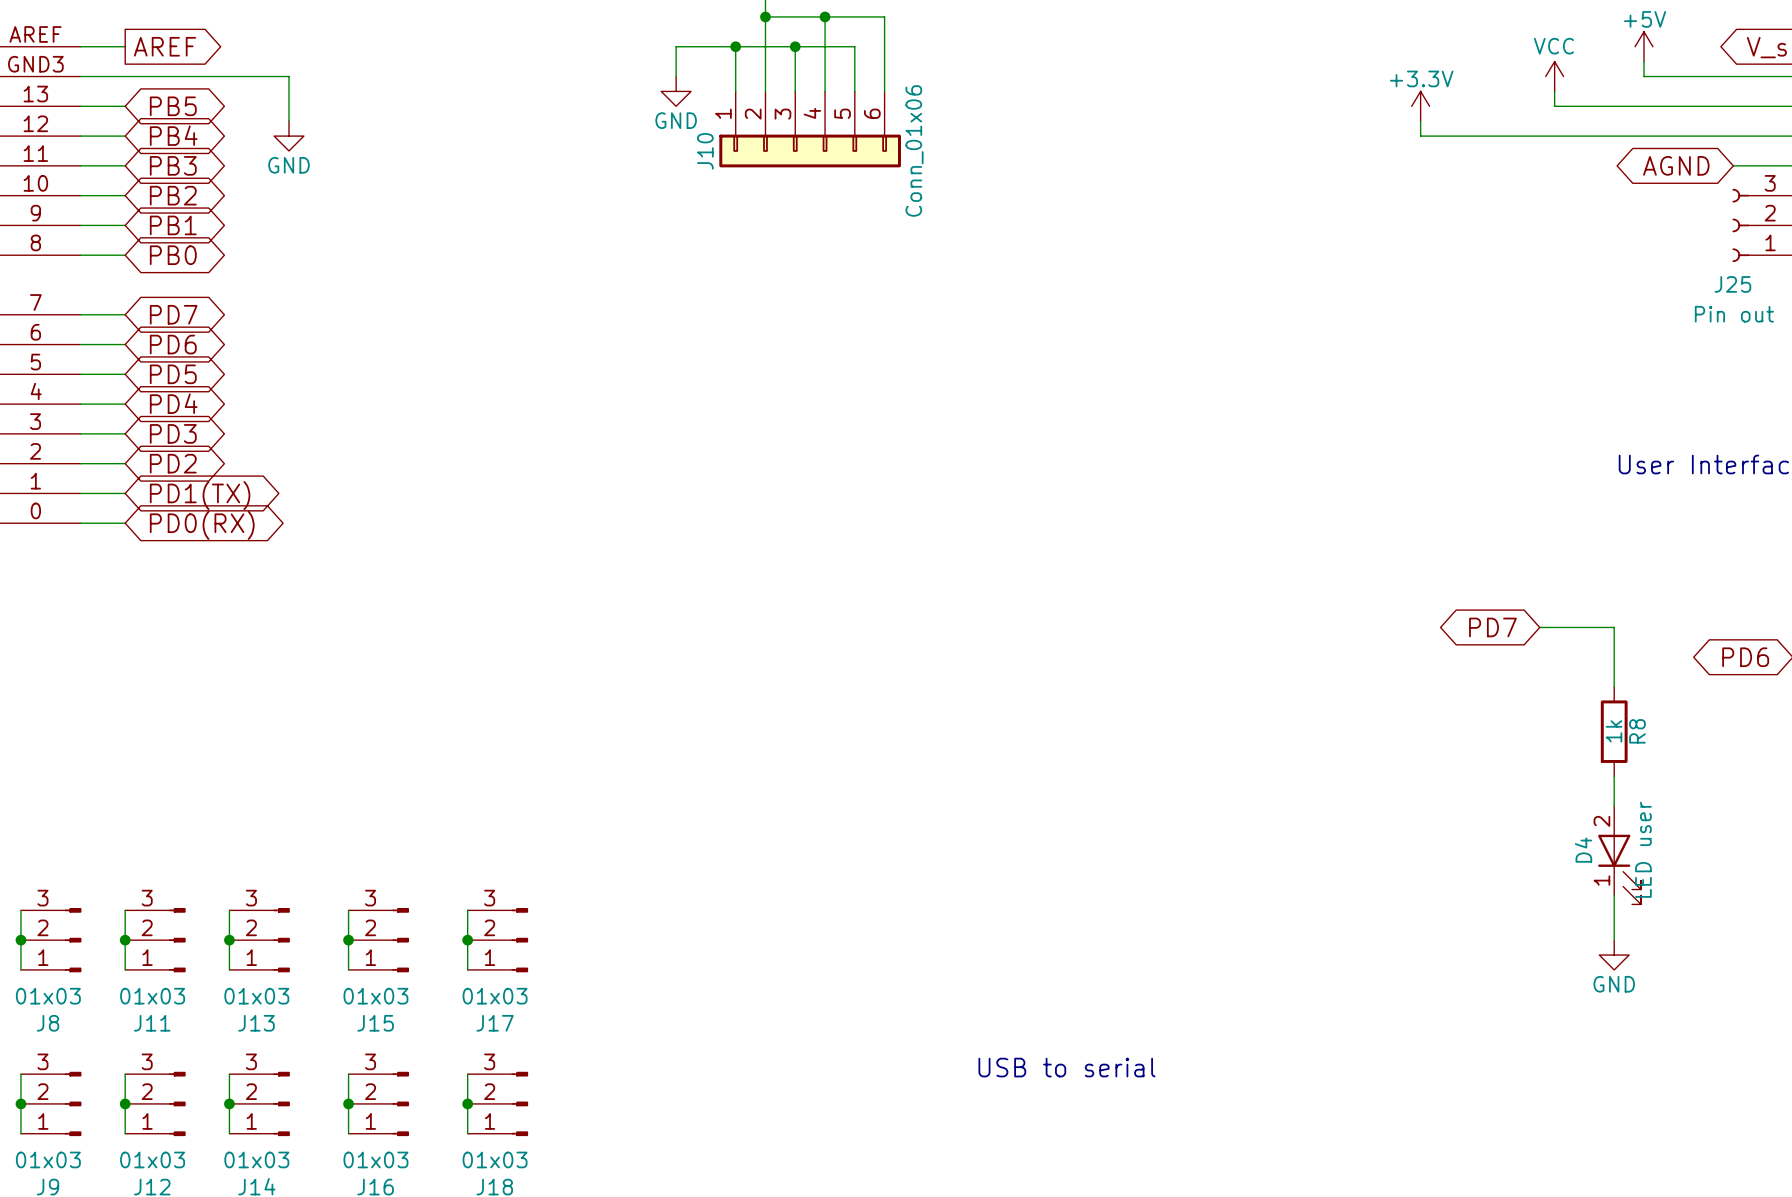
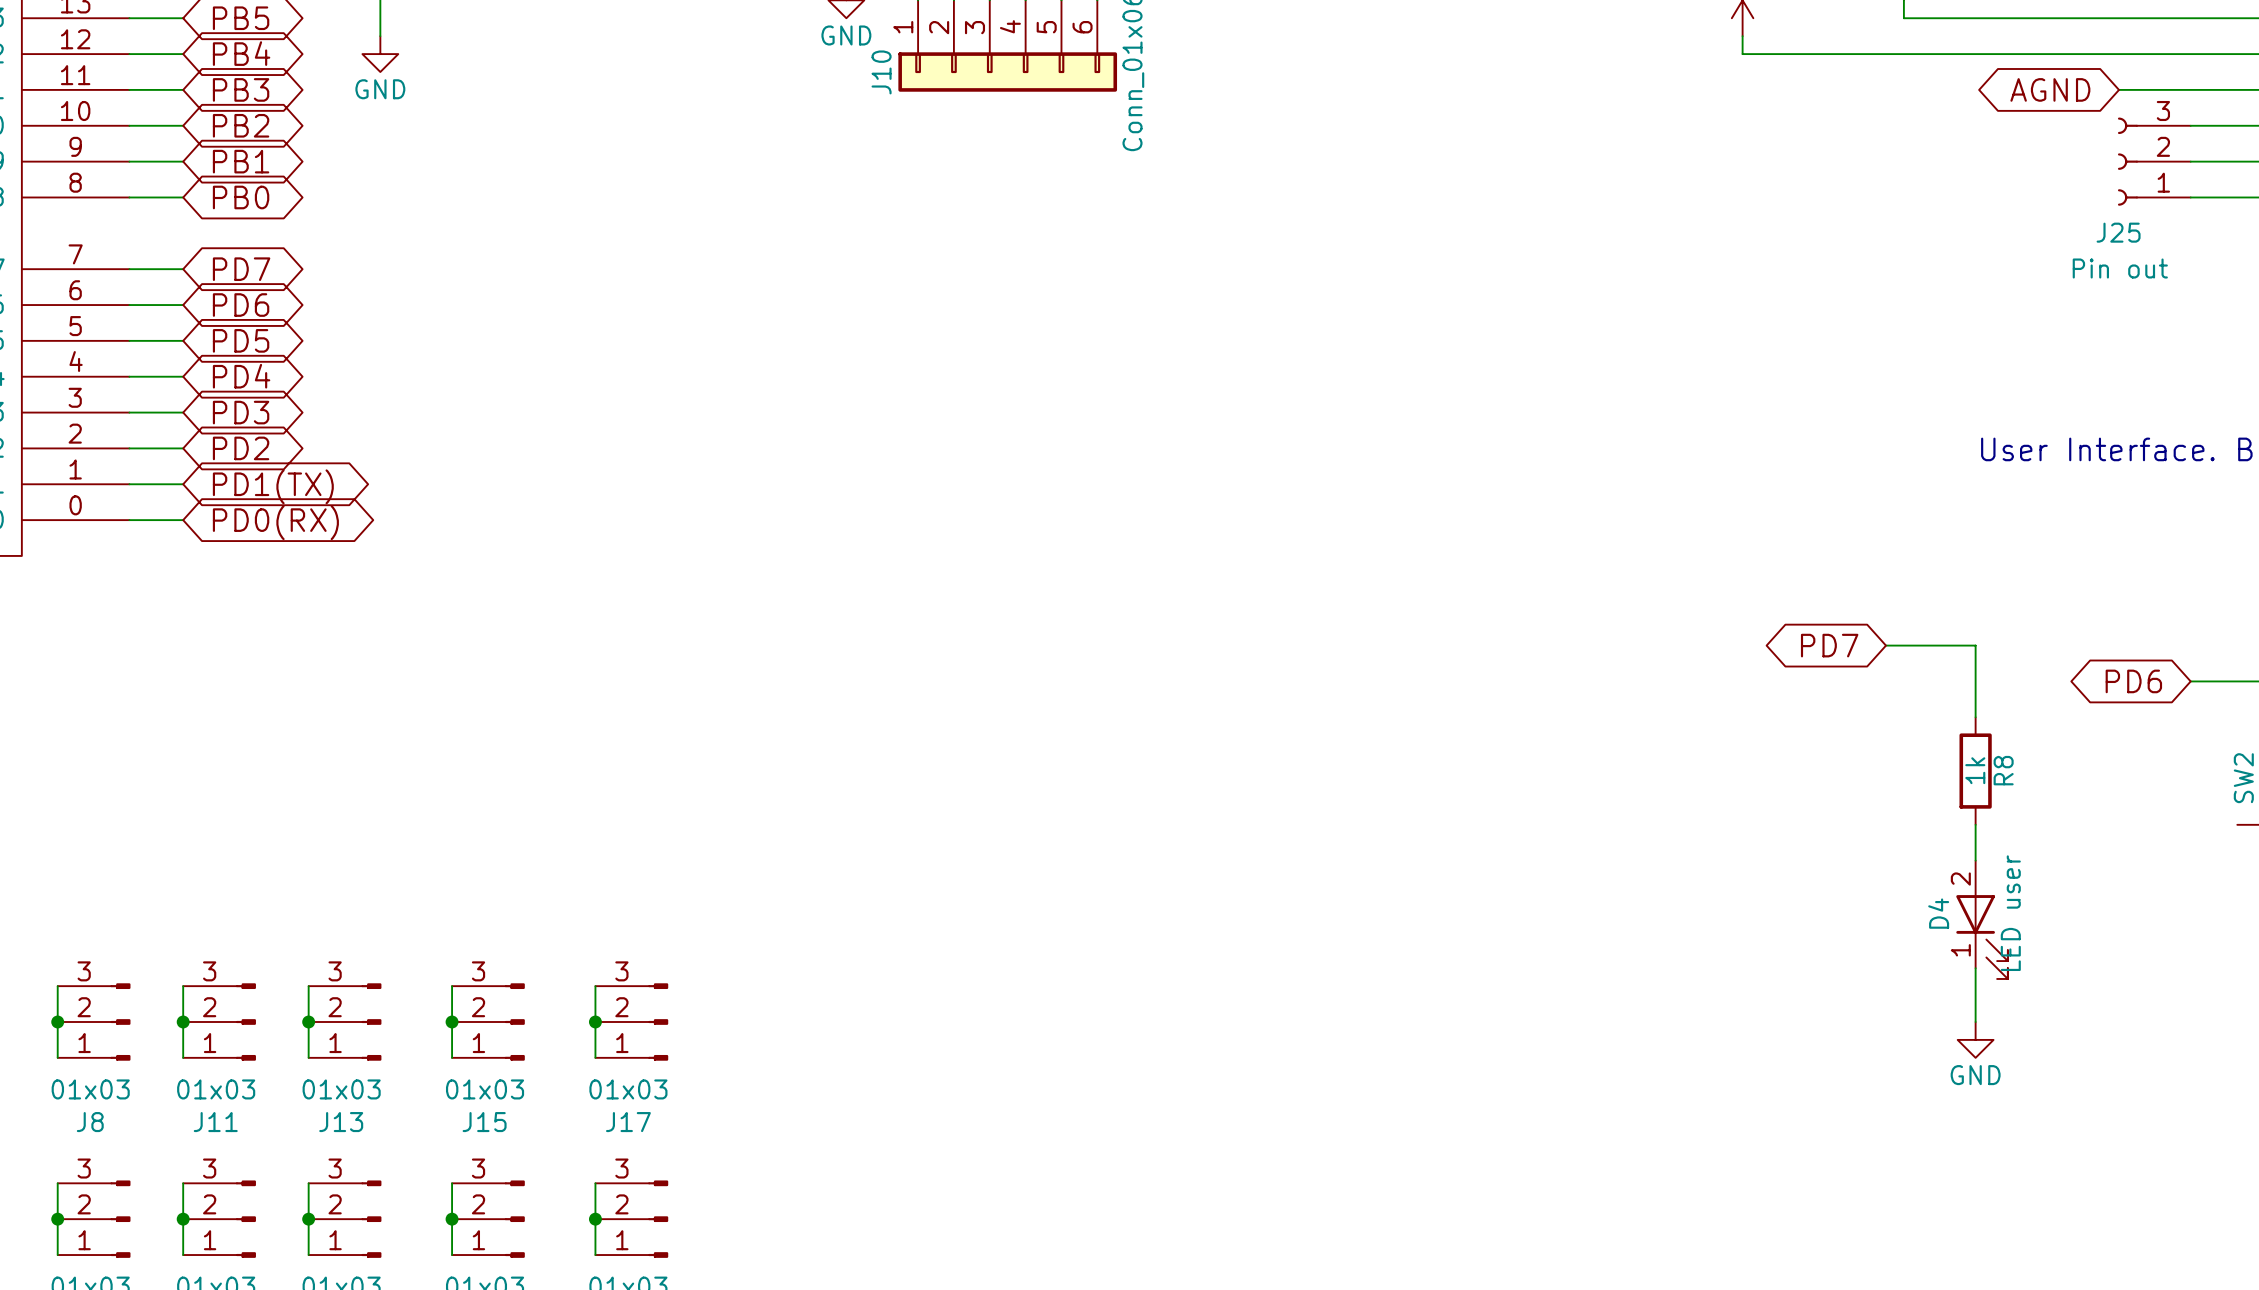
text: USB to serial (1067, 1067) -> none

